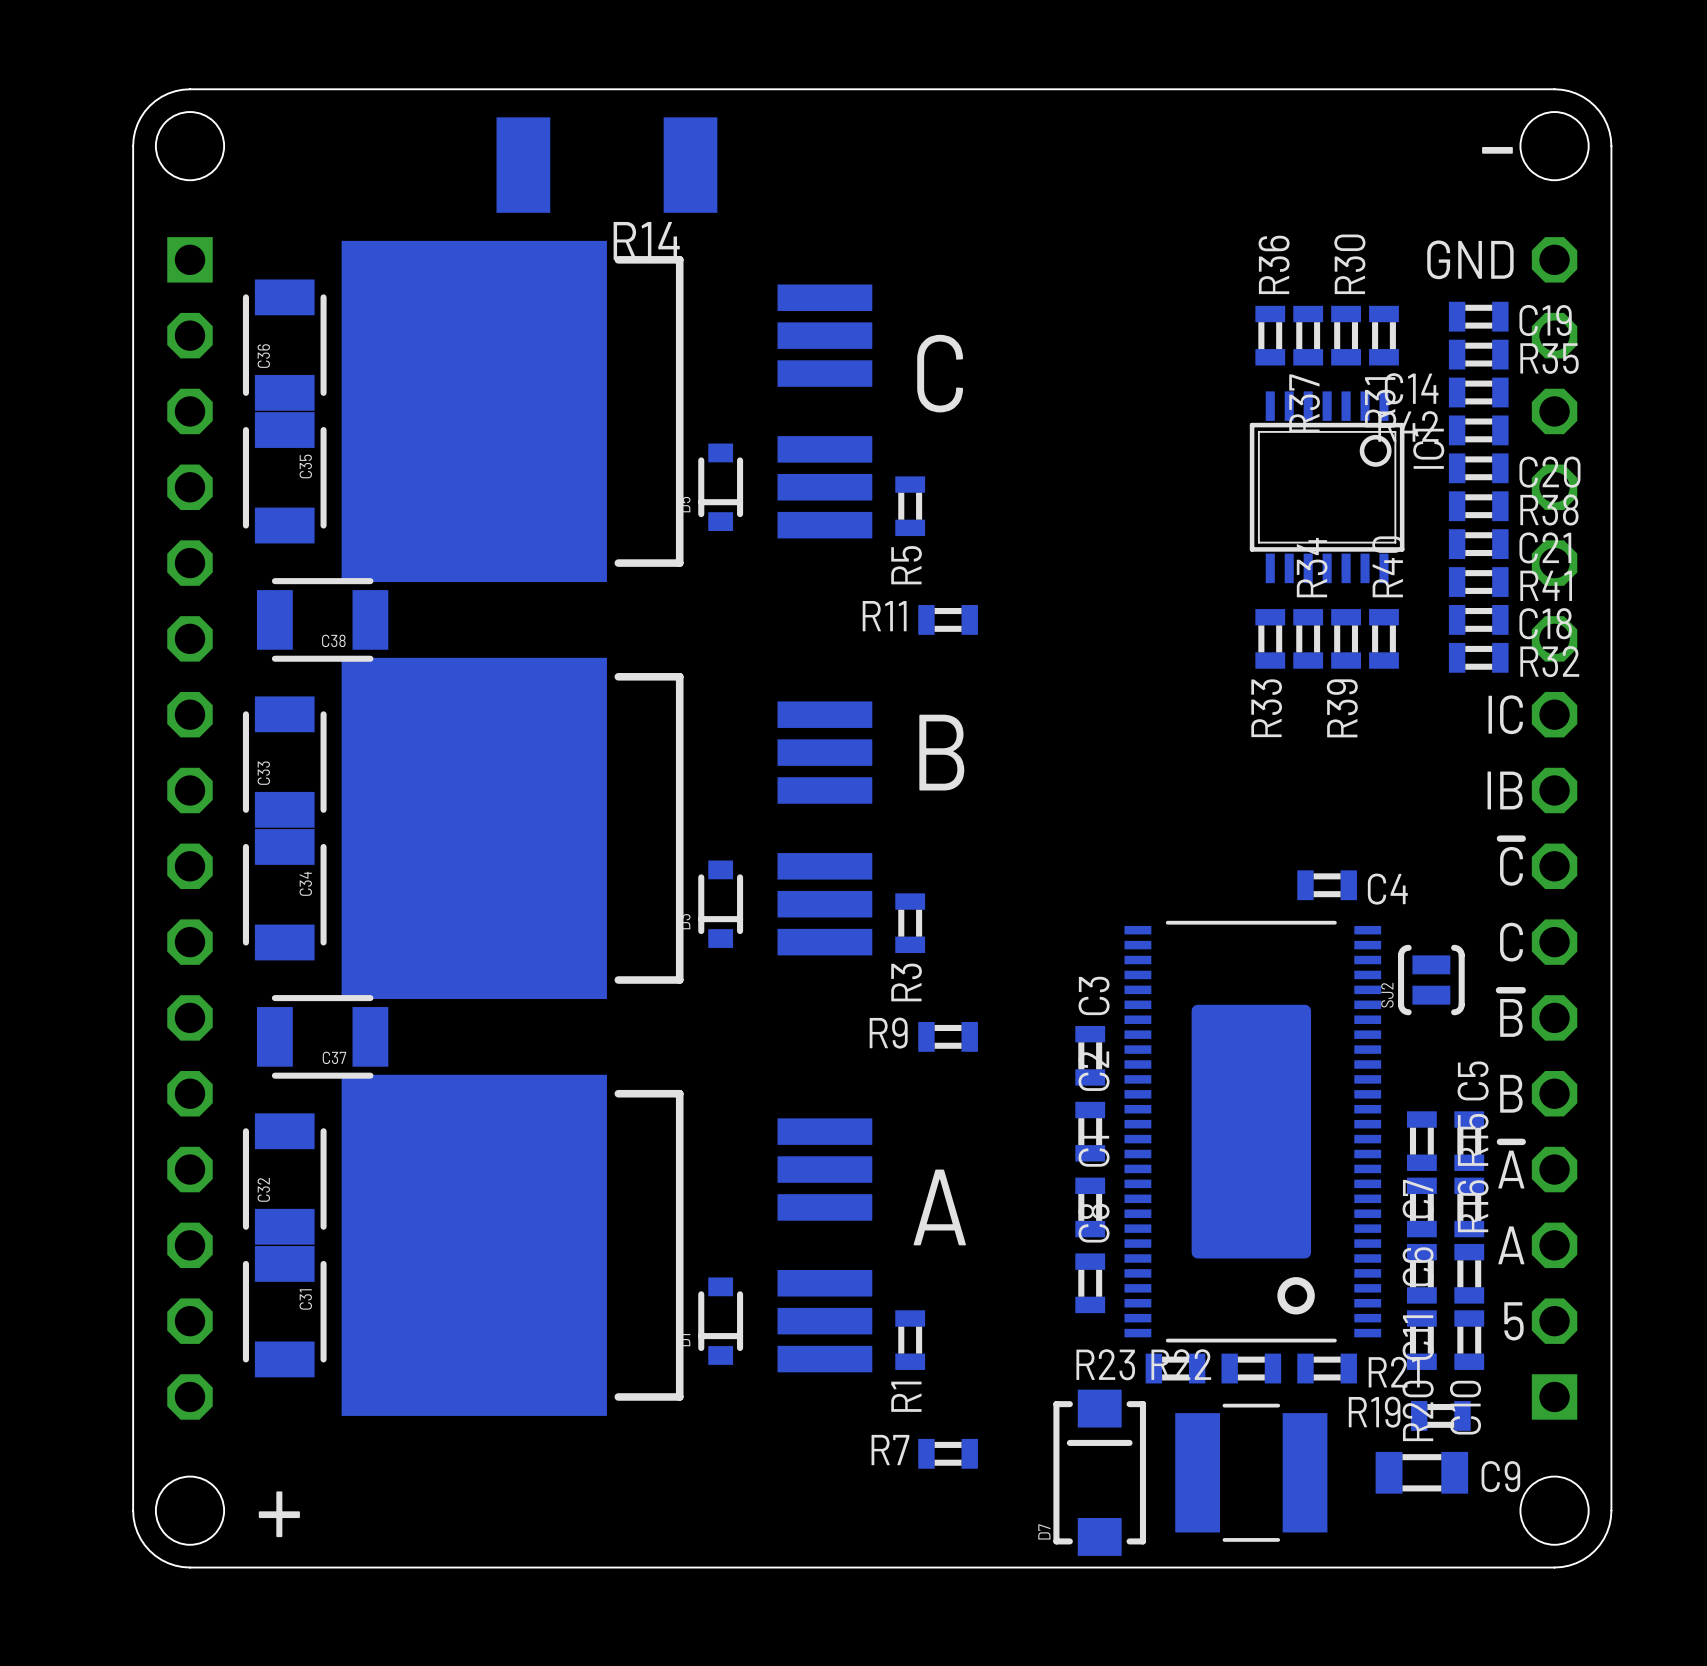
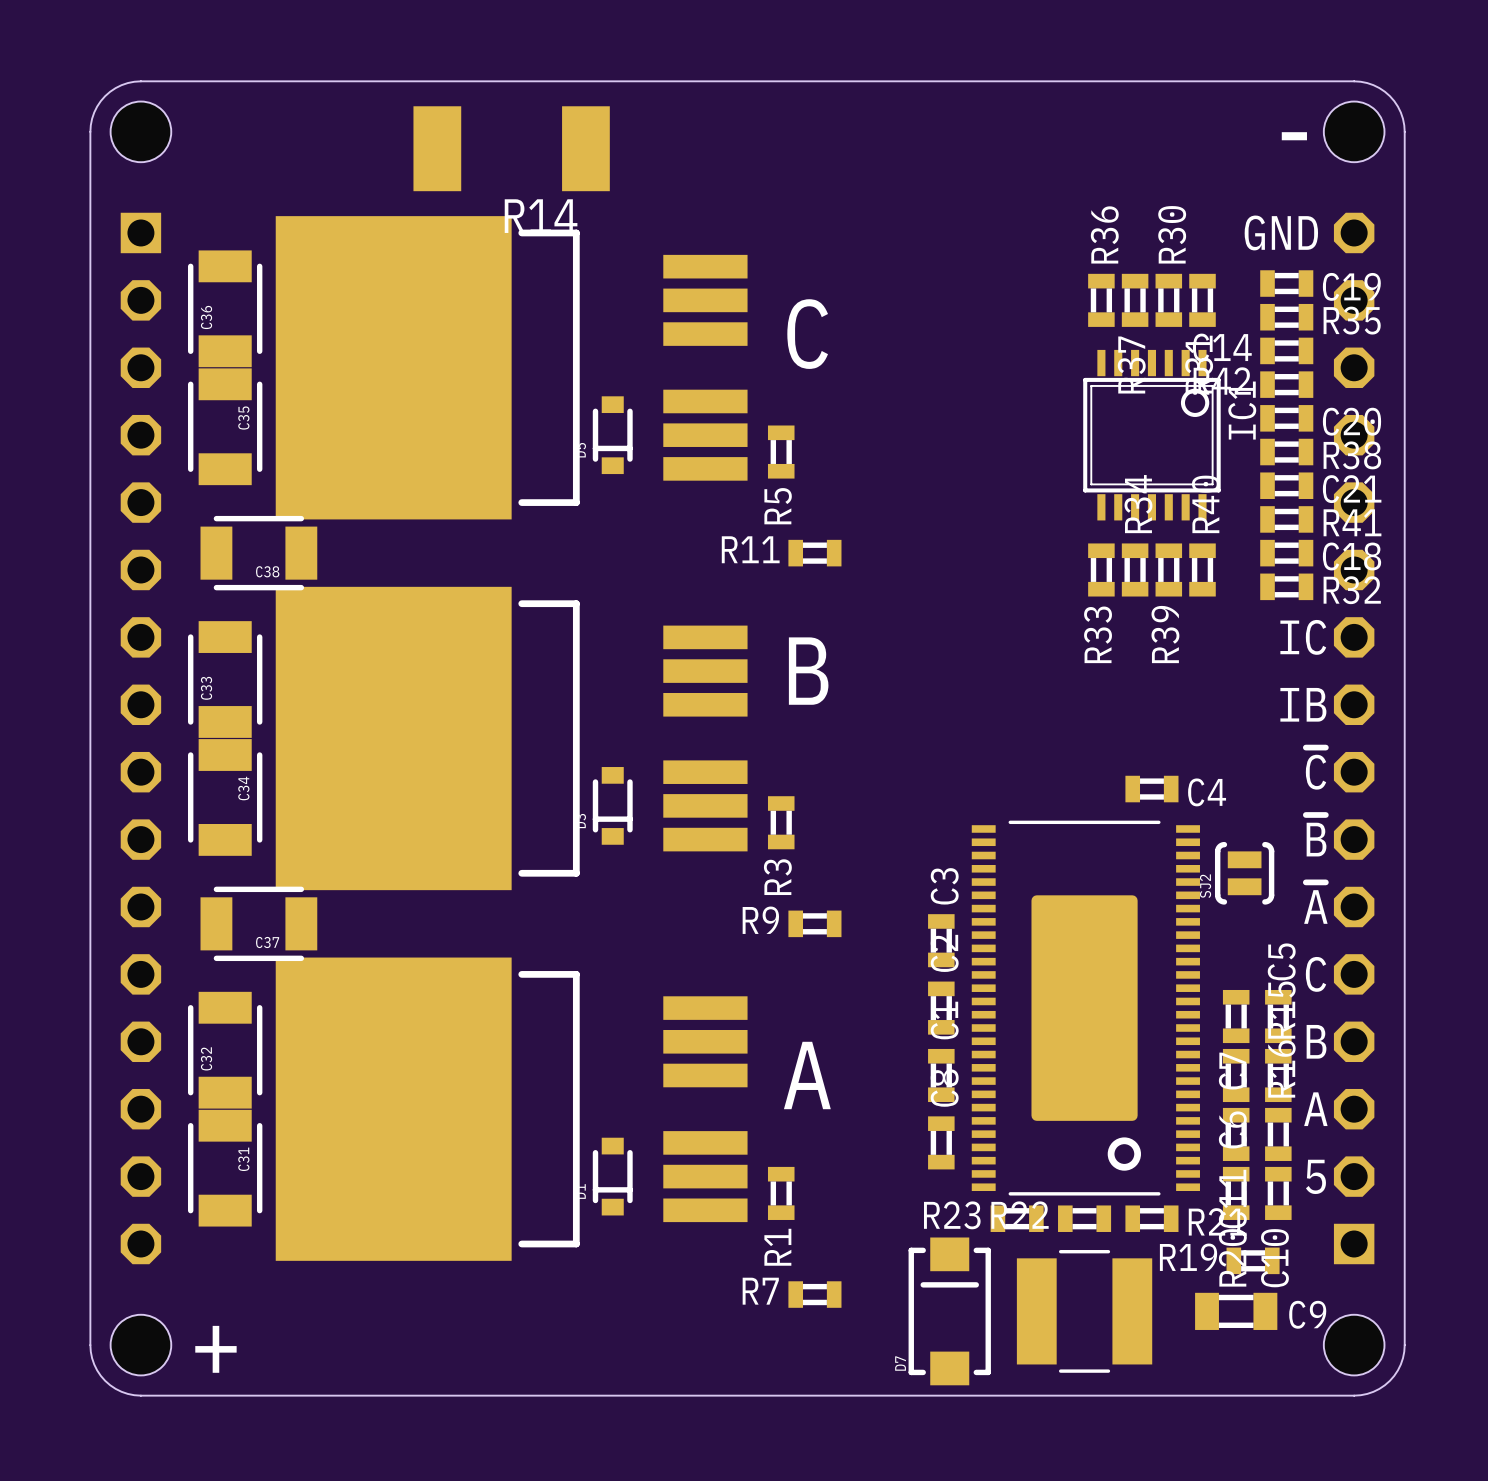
text: C (1511, 942) -> ~{B} (1316, 835)
text: ~{B} (1510, 1013) -> ~{A} (1315, 903)
text: B (1511, 1093) -> C (1316, 974)
text: ~{A} (1511, 1165) -> B (1316, 1041)

